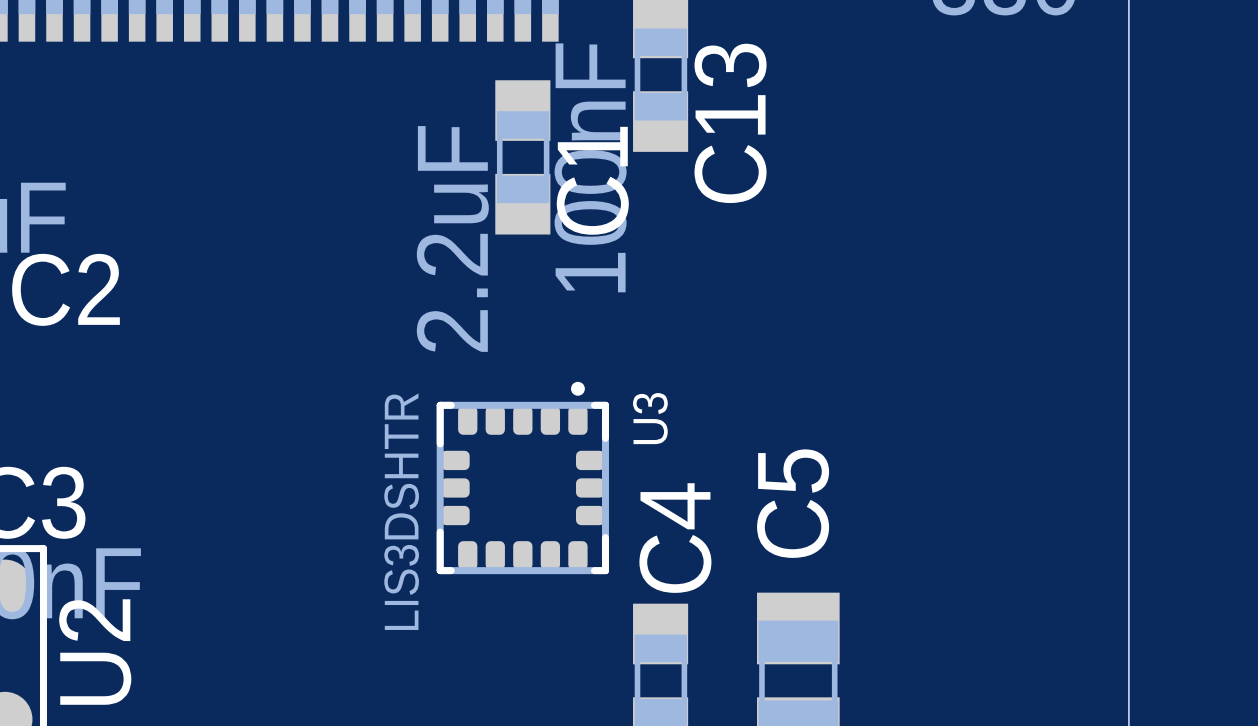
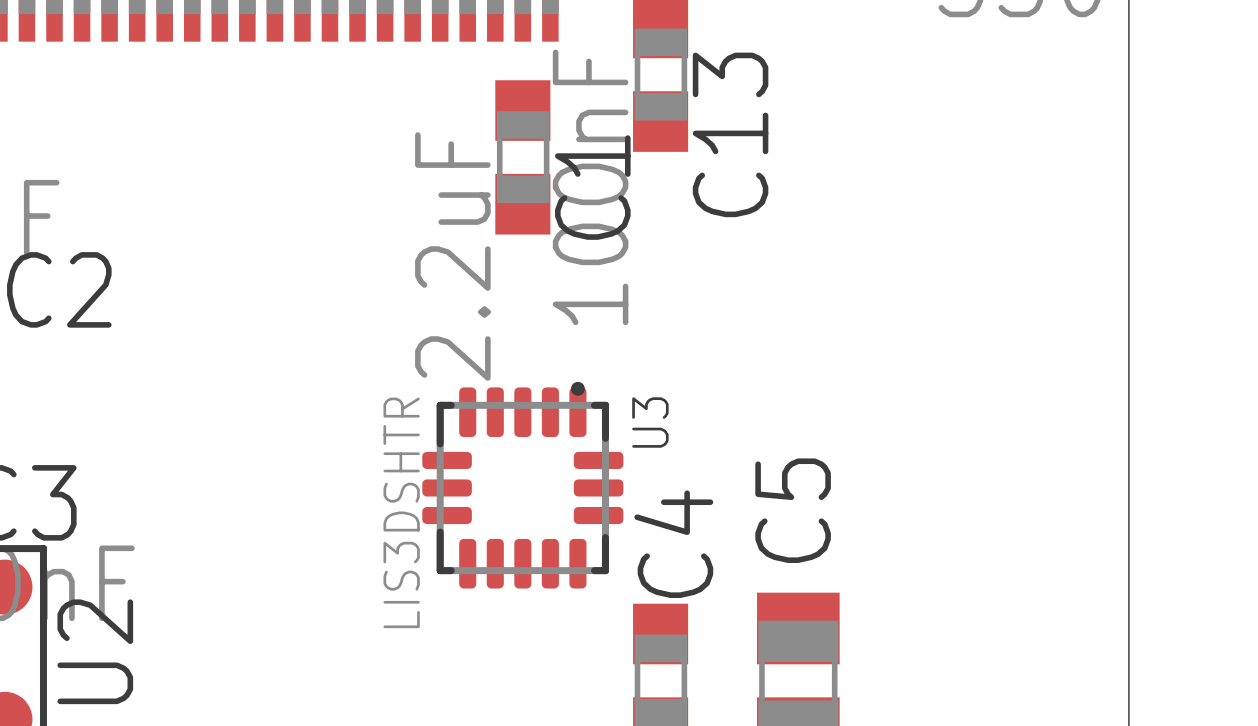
U3 footprint: [436, 381, 609, 575] -> [422, 381, 624, 589]

